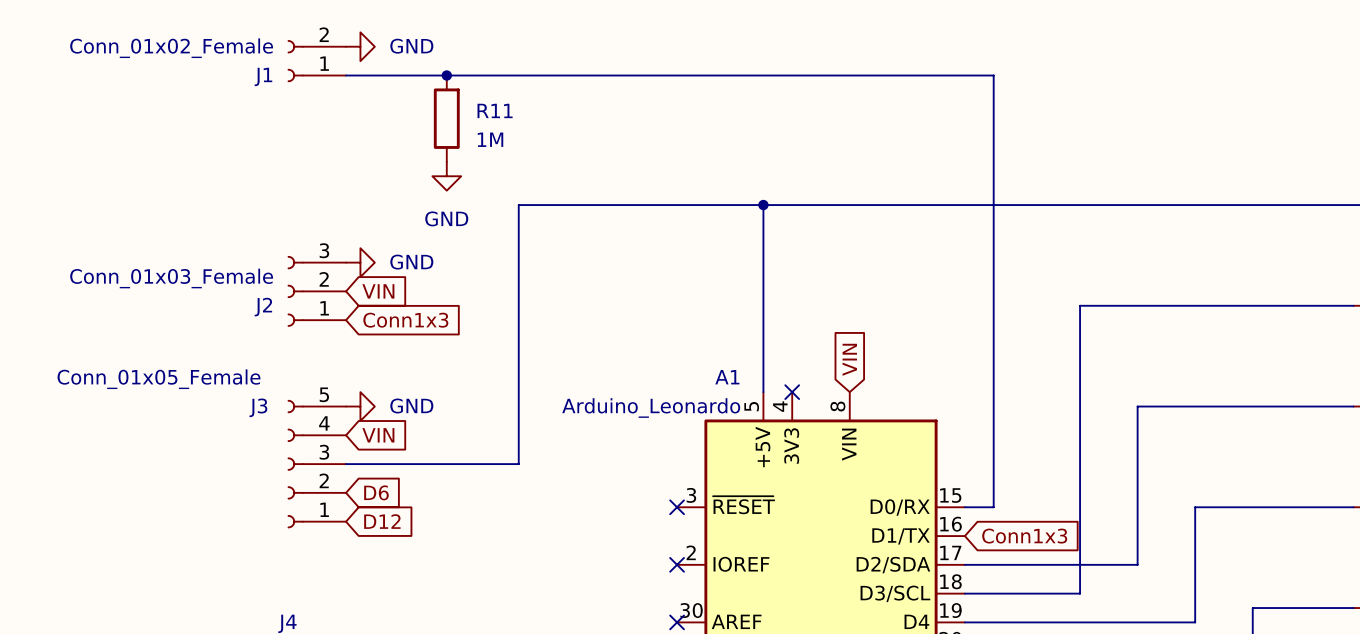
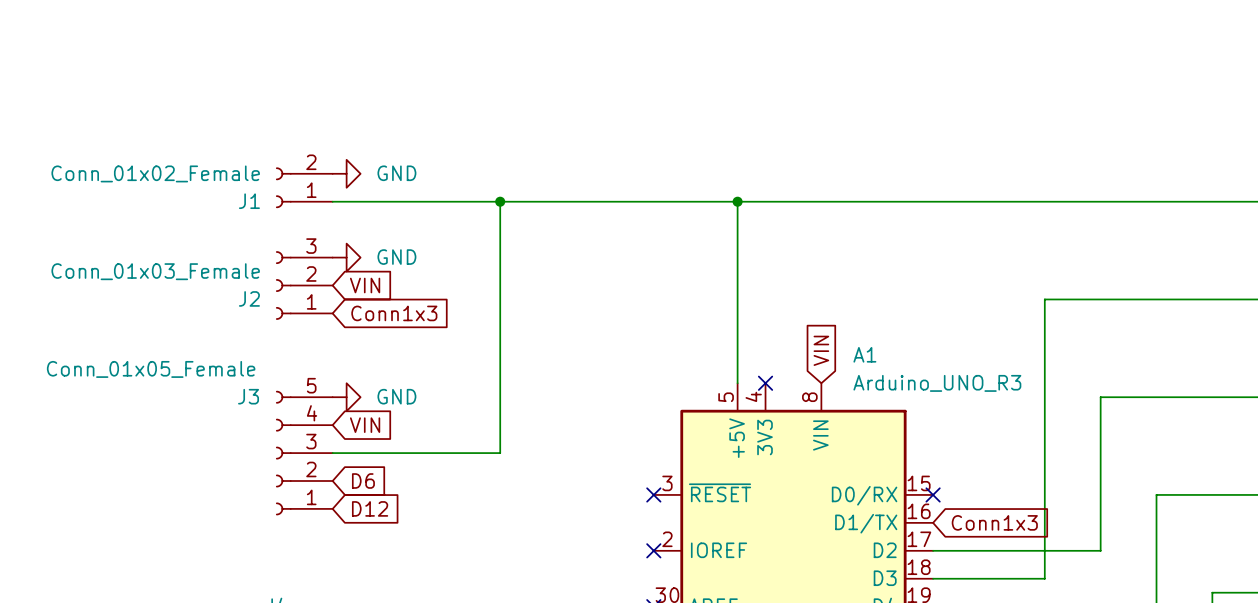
power symbol: GND (360, 46) -> none
J1 position: (316, 61) -> (304, 187)
wire: (346, 75) (993, 75) (993, 507) (964, 507) -> none
junction: (446, 75) -> none
R11: 1M (446, 118) -> none
power symbol: none -> GND (346, 173)
power symbol: GND (446, 176) -> none
wire: none -> (332, 201) (500, 201)
junction: none -> (500, 201)
A1 name position: A1 (727, 377) -> A1 (864, 354)
A1 value: Arduino_Leonardo (651, 408) -> Arduino_UNO_R3 (937, 383)
no-connect mark: none -> (933, 494)
A1 pin name: D2/SDA (893, 565) -> D2 (885, 550)
A1 pin name: D3/SCL (895, 593) -> D3 (885, 578)

